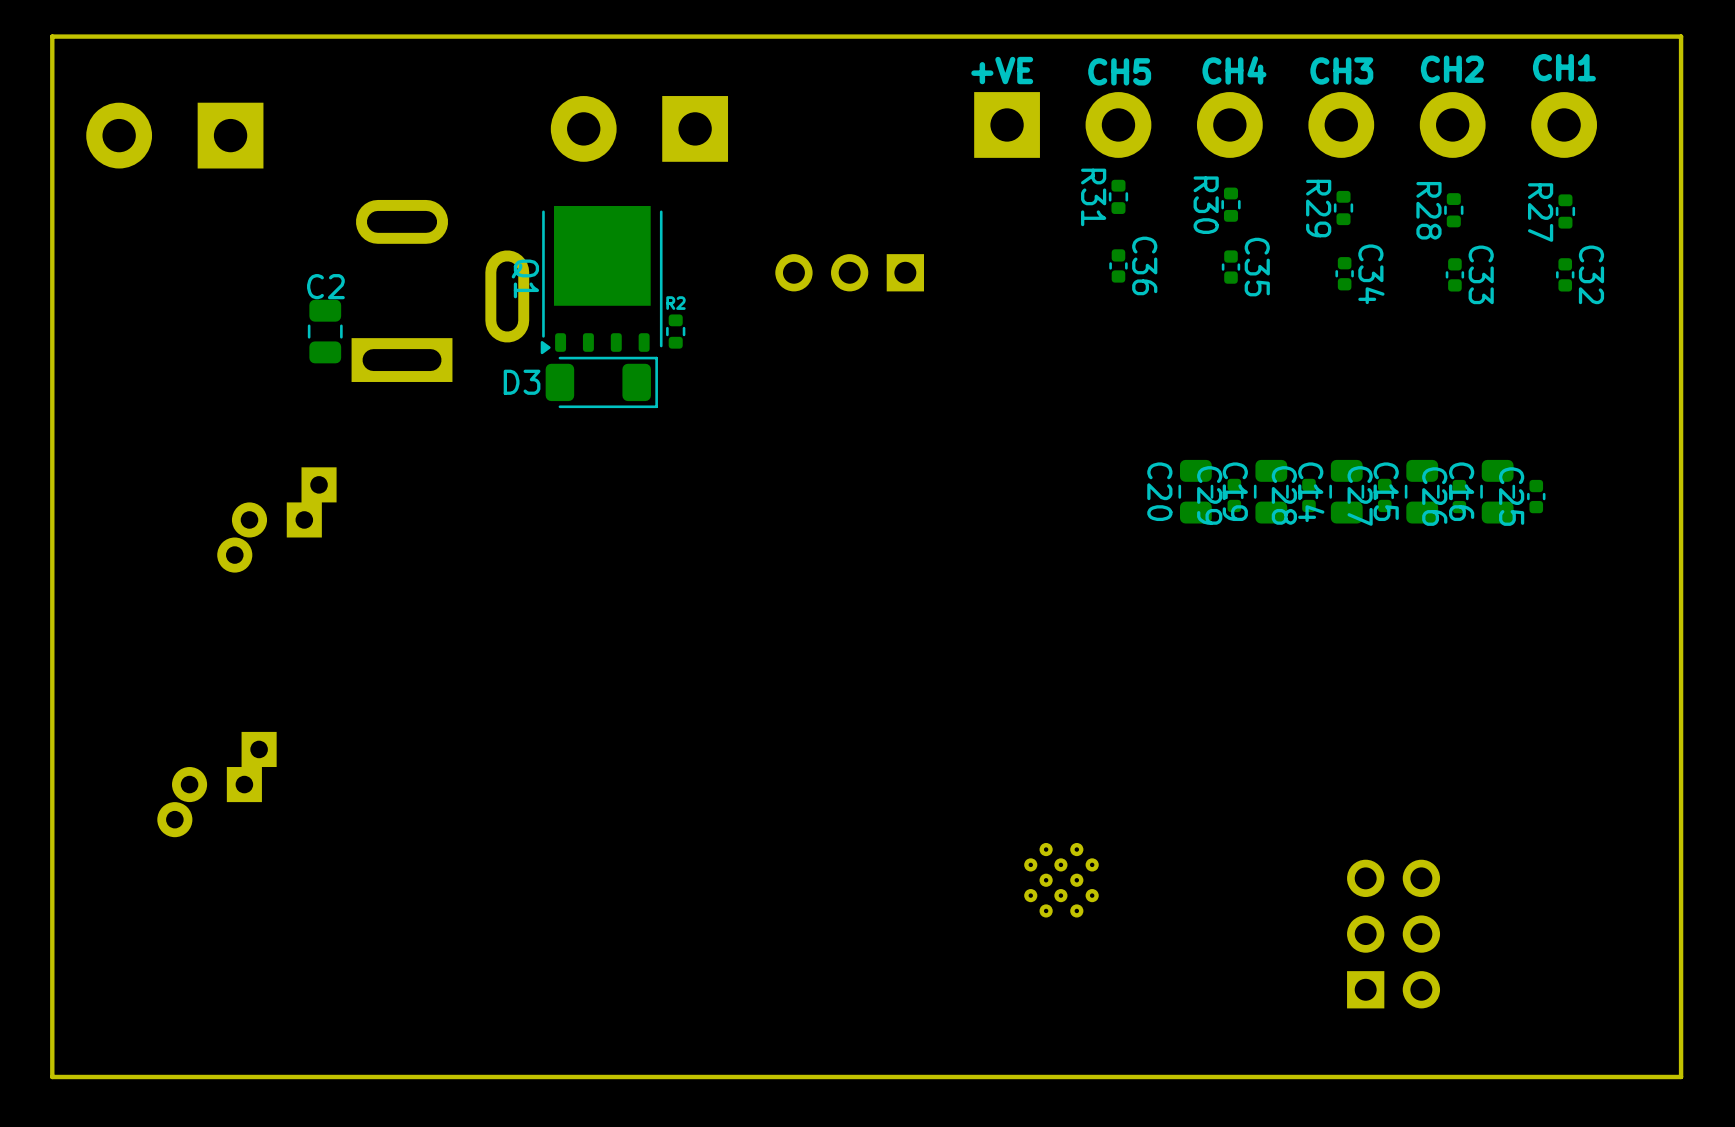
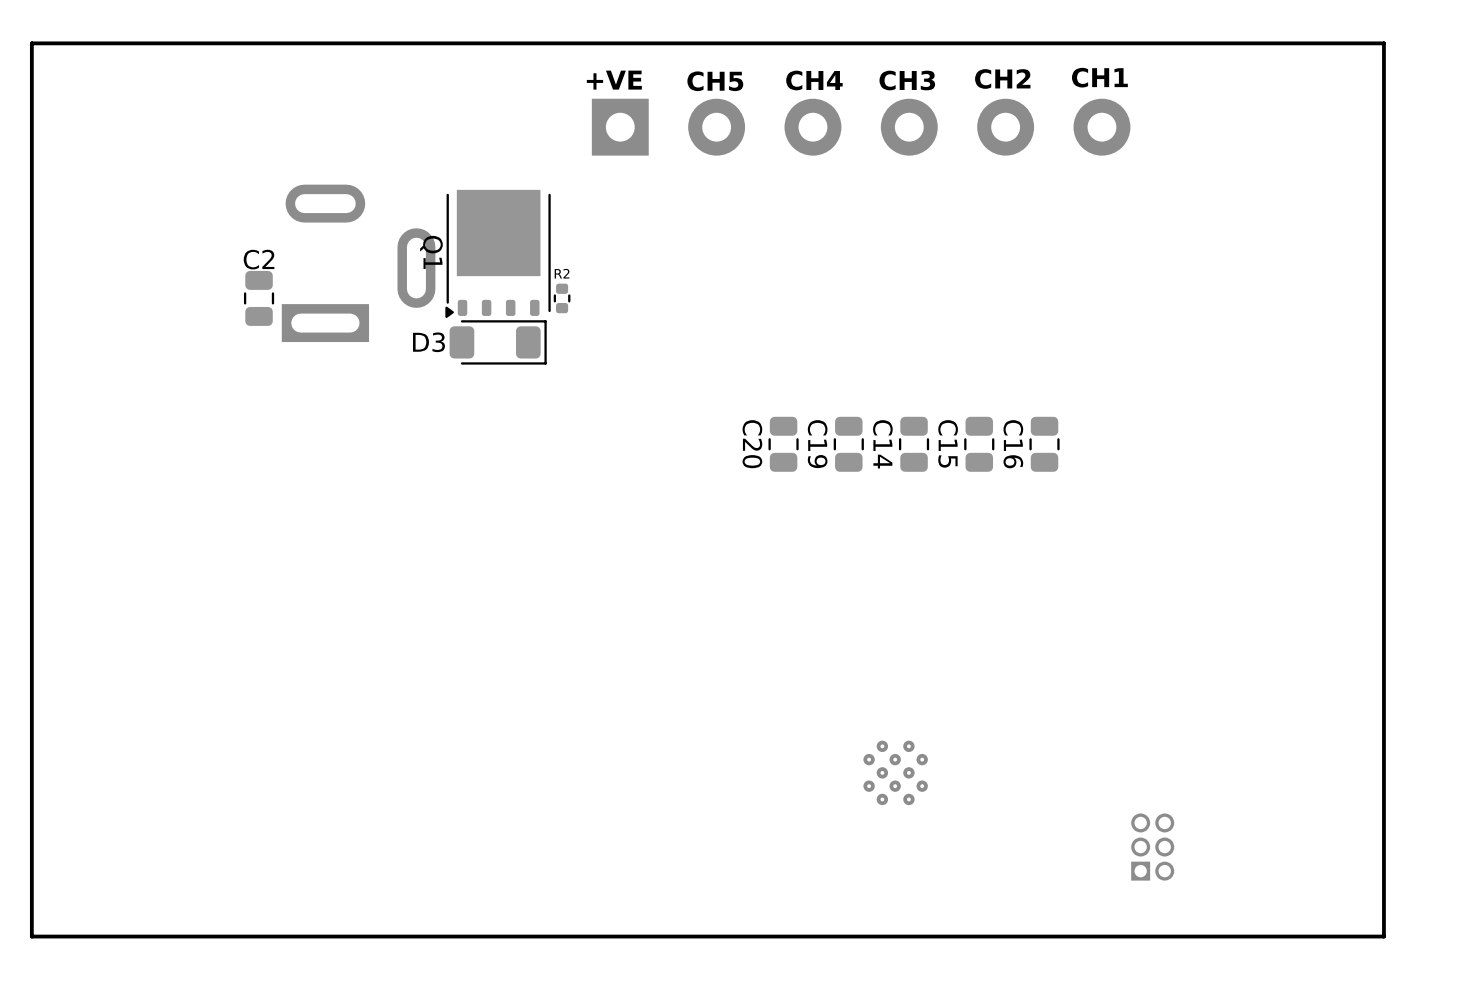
board edge: (1626, 36) (1681, 36) (1681, 1076) (52, 1076) (52, 36) (62, 36) -> (1383, 43) (1383, 936) (31, 936) (31, 43)
text position: CH1 (1564, 67) -> CH1 (1099, 77)
text position: CH2 (1452, 69) -> CH2 (1002, 78)
text position: +VE (1002, 70) -> +VE (614, 80)
text position: CH4 (1234, 70) -> CH4 (814, 80)
text position: CH3 (1341, 70) -> CH3 (907, 80)
text position: CH5 (1119, 71) -> CH5 (715, 81)
part position: (1285, 124) -> (861, 127)
part: (639, 128) -> none
part: (174, 135) -> none
R31: (1118, 196) -> none
R30: (1230, 204) -> none
R29: (1343, 208) -> none
R28: (1453, 210) -> none
R27: (1565, 211) -> none
C36: (1118, 265) -> none
C35: (1230, 267) -> none
part: (849, 272) -> none
C34: (1344, 273) -> none
C33: (1454, 274) -> none
C32: (1565, 274) -> none
C20 position: (1195, 491) -> (783, 444)
C19 position: (1271, 491) -> (848, 444)
C14 position: (1346, 491) -> (914, 444)
C15 position: (1422, 491) -> (979, 444)
C16 position: (1497, 491) -> (1044, 444)
C29: (1234, 495) -> none
C28: (1308, 495) -> none
C27: (1384, 495) -> none
C26: (1459, 496) -> none
C25: (1536, 496) -> none
part: (276, 519) -> none
part: (216, 784) -> none
part: (1393, 934) -> none
part: none -> (1152, 847)

